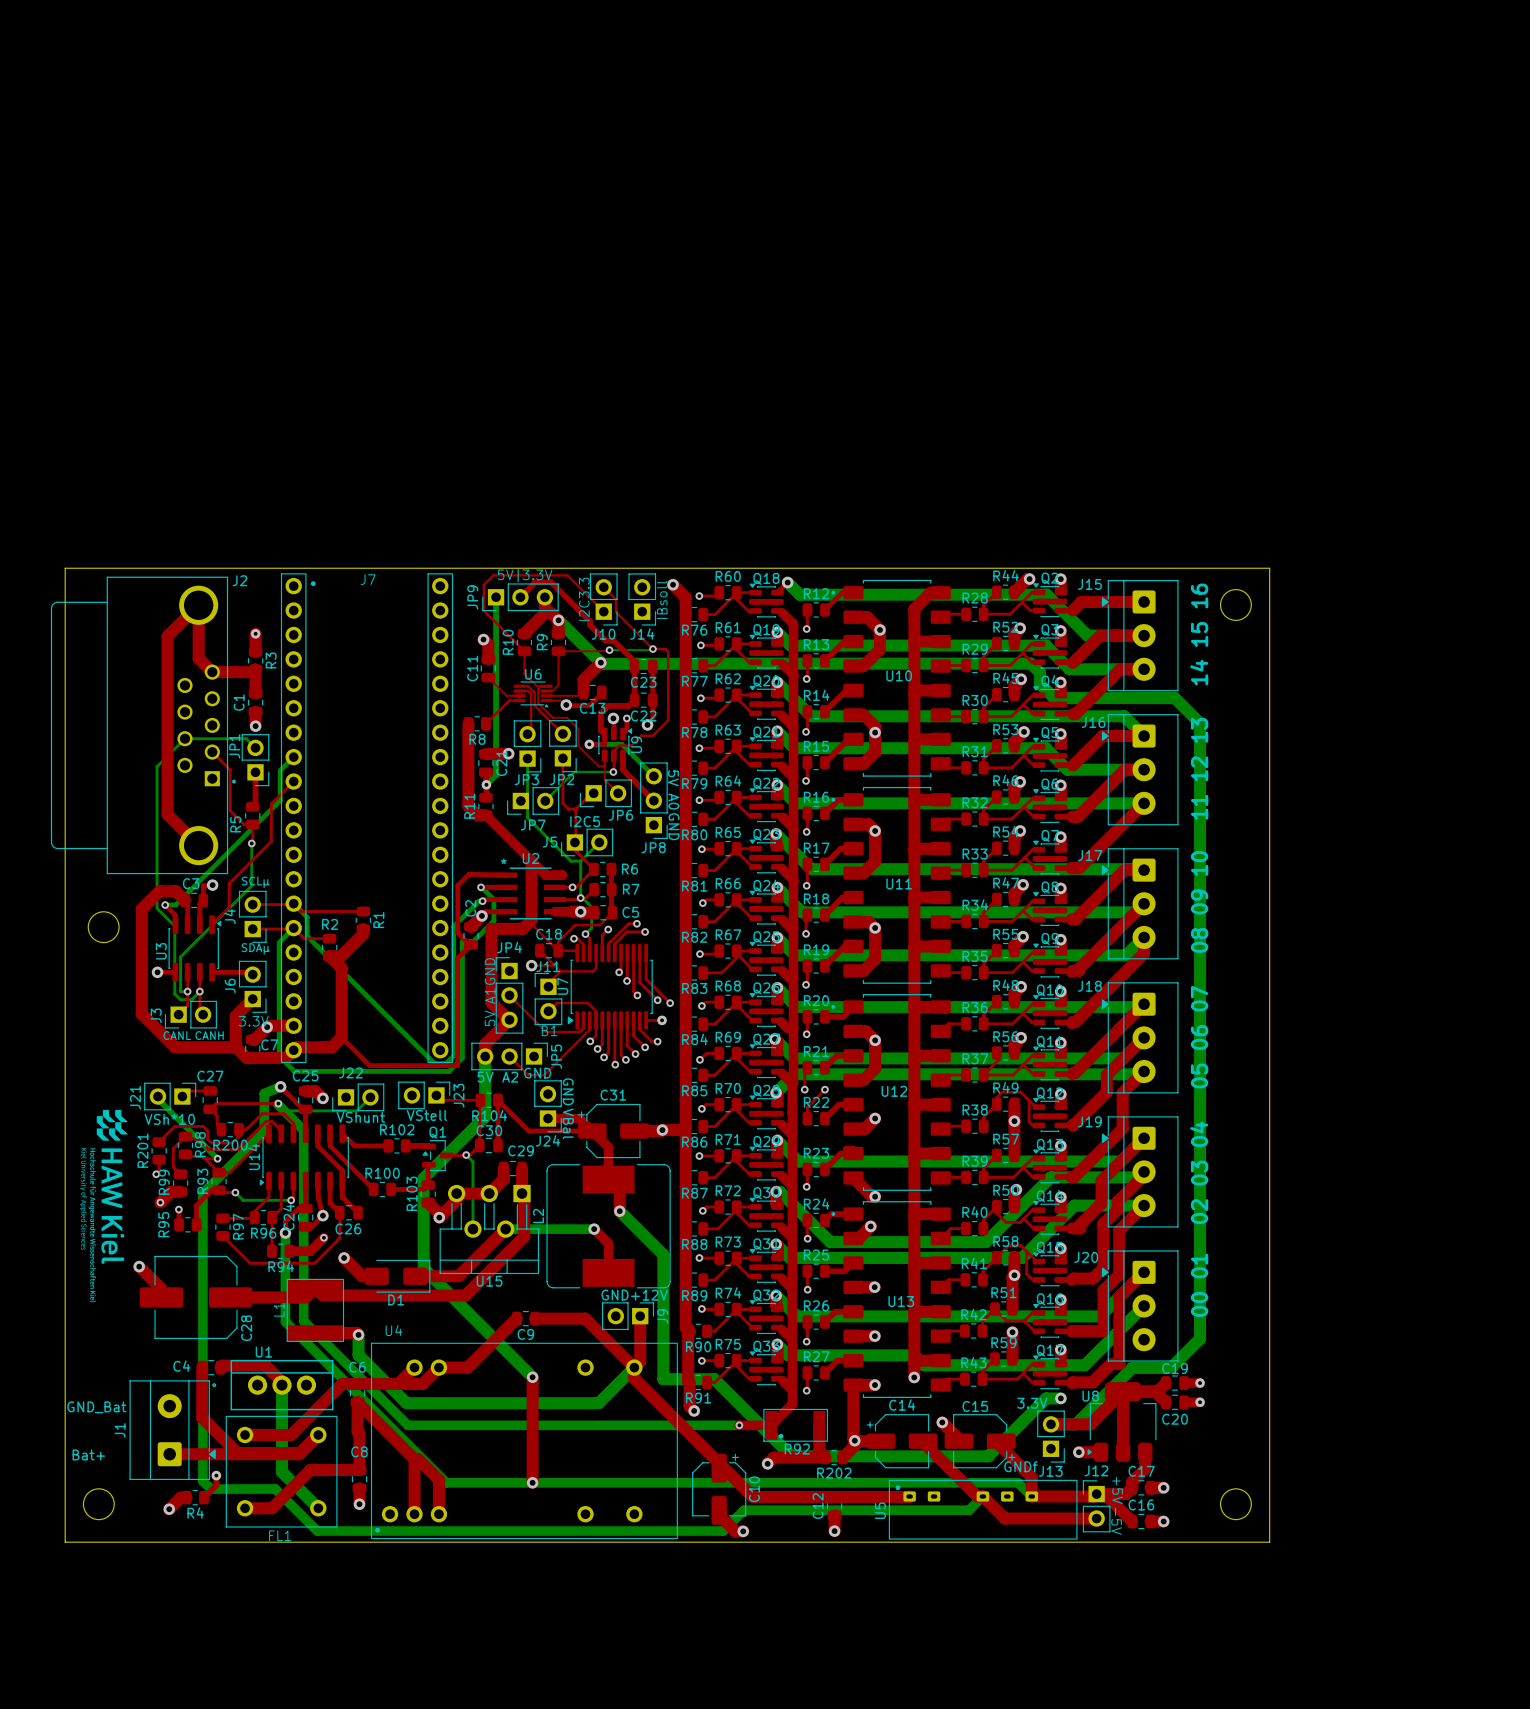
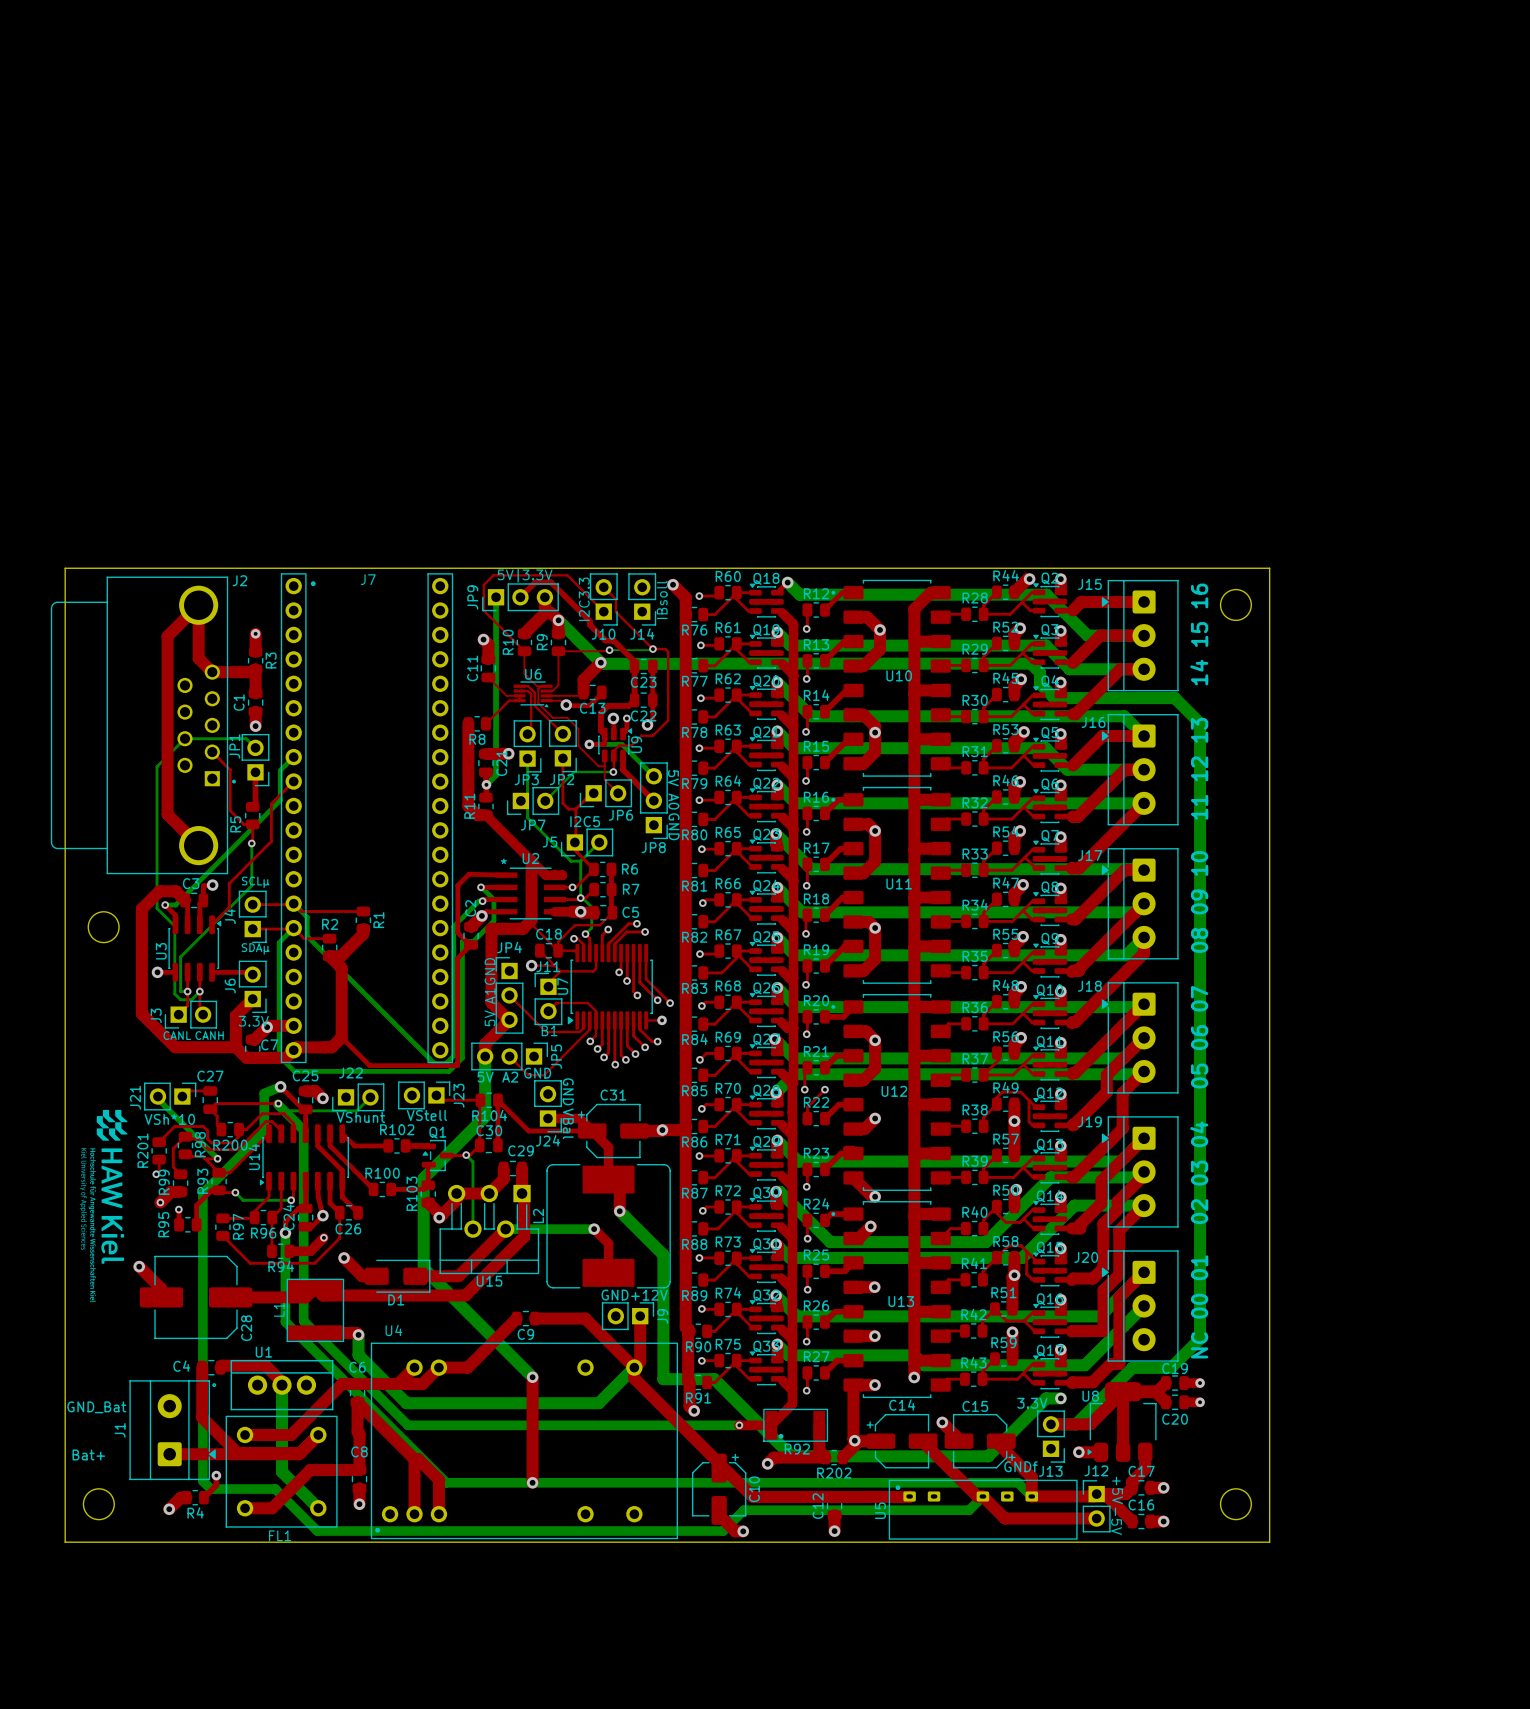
text: 00 01 (1199, 1285) -> NC 00 01 (1199, 1306)

